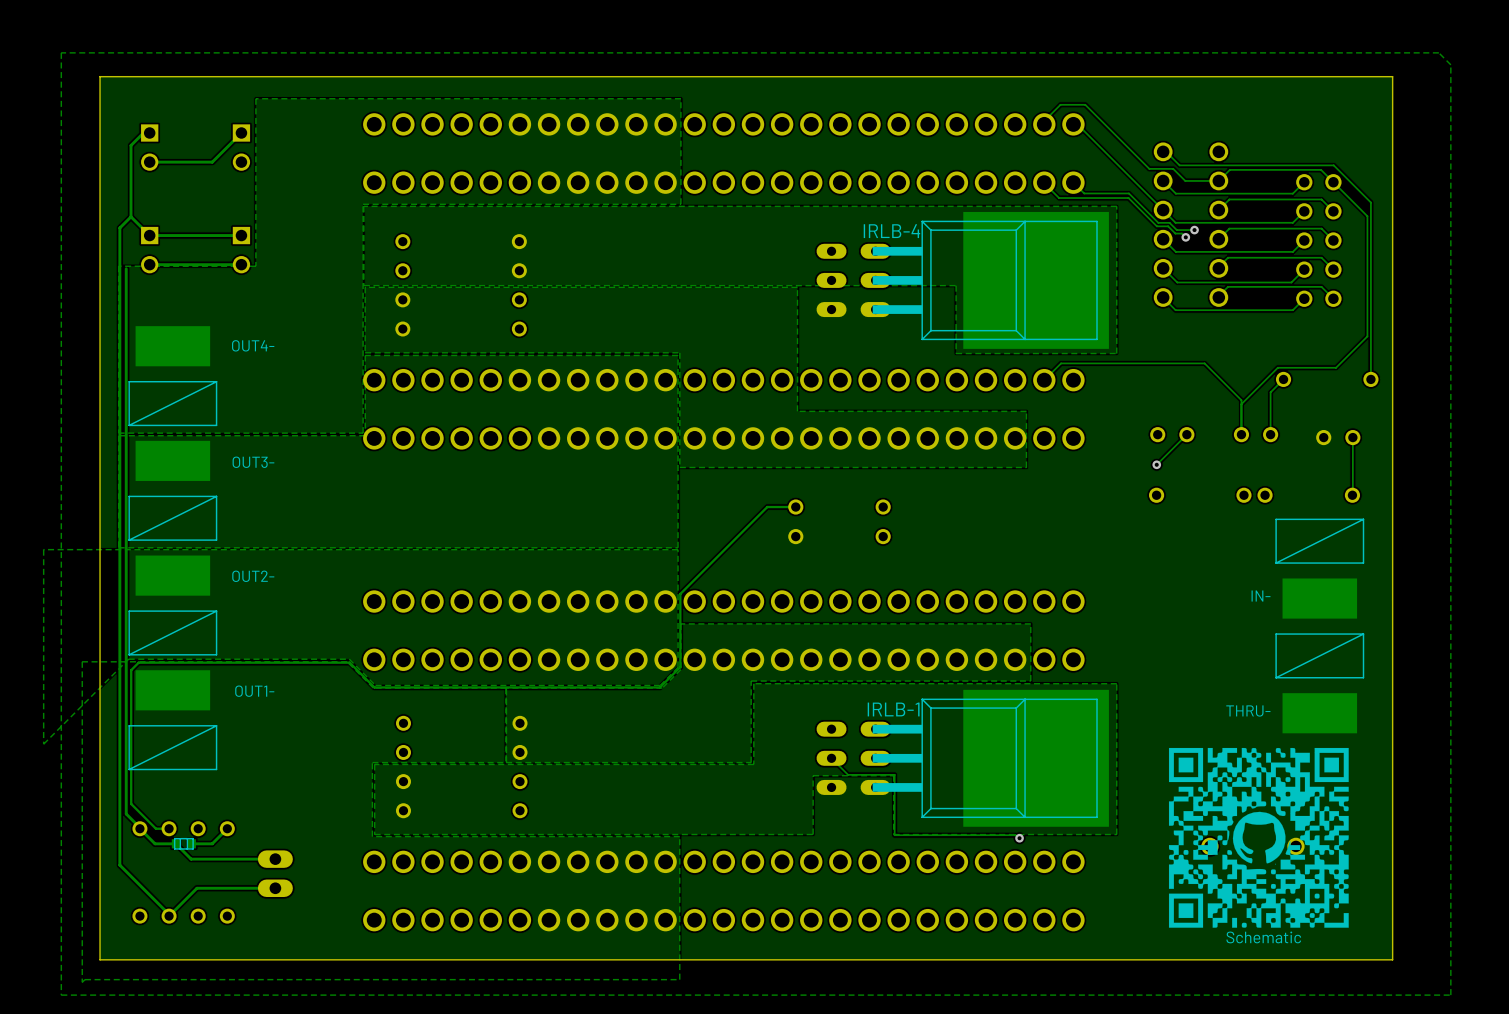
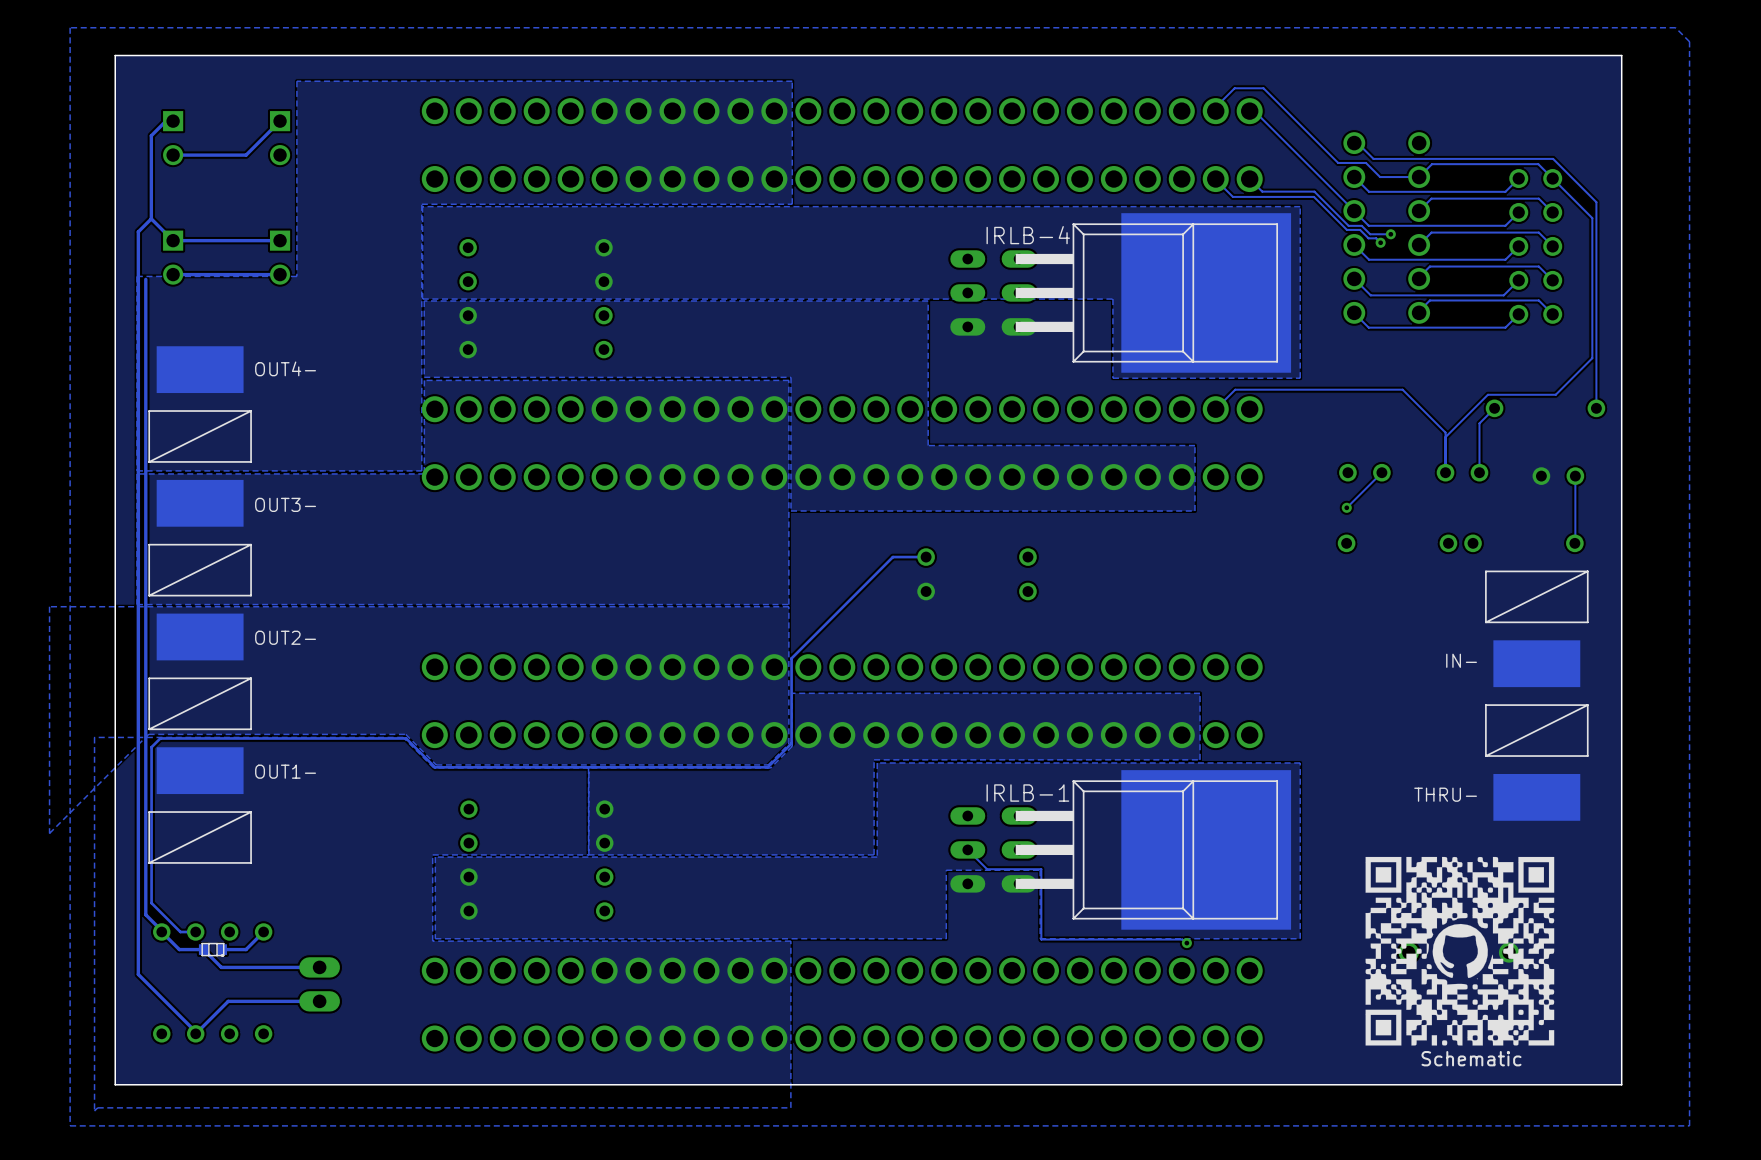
drawing shape: [1168, 747, 1349, 928] -> [1365, 856, 1555, 1046]

